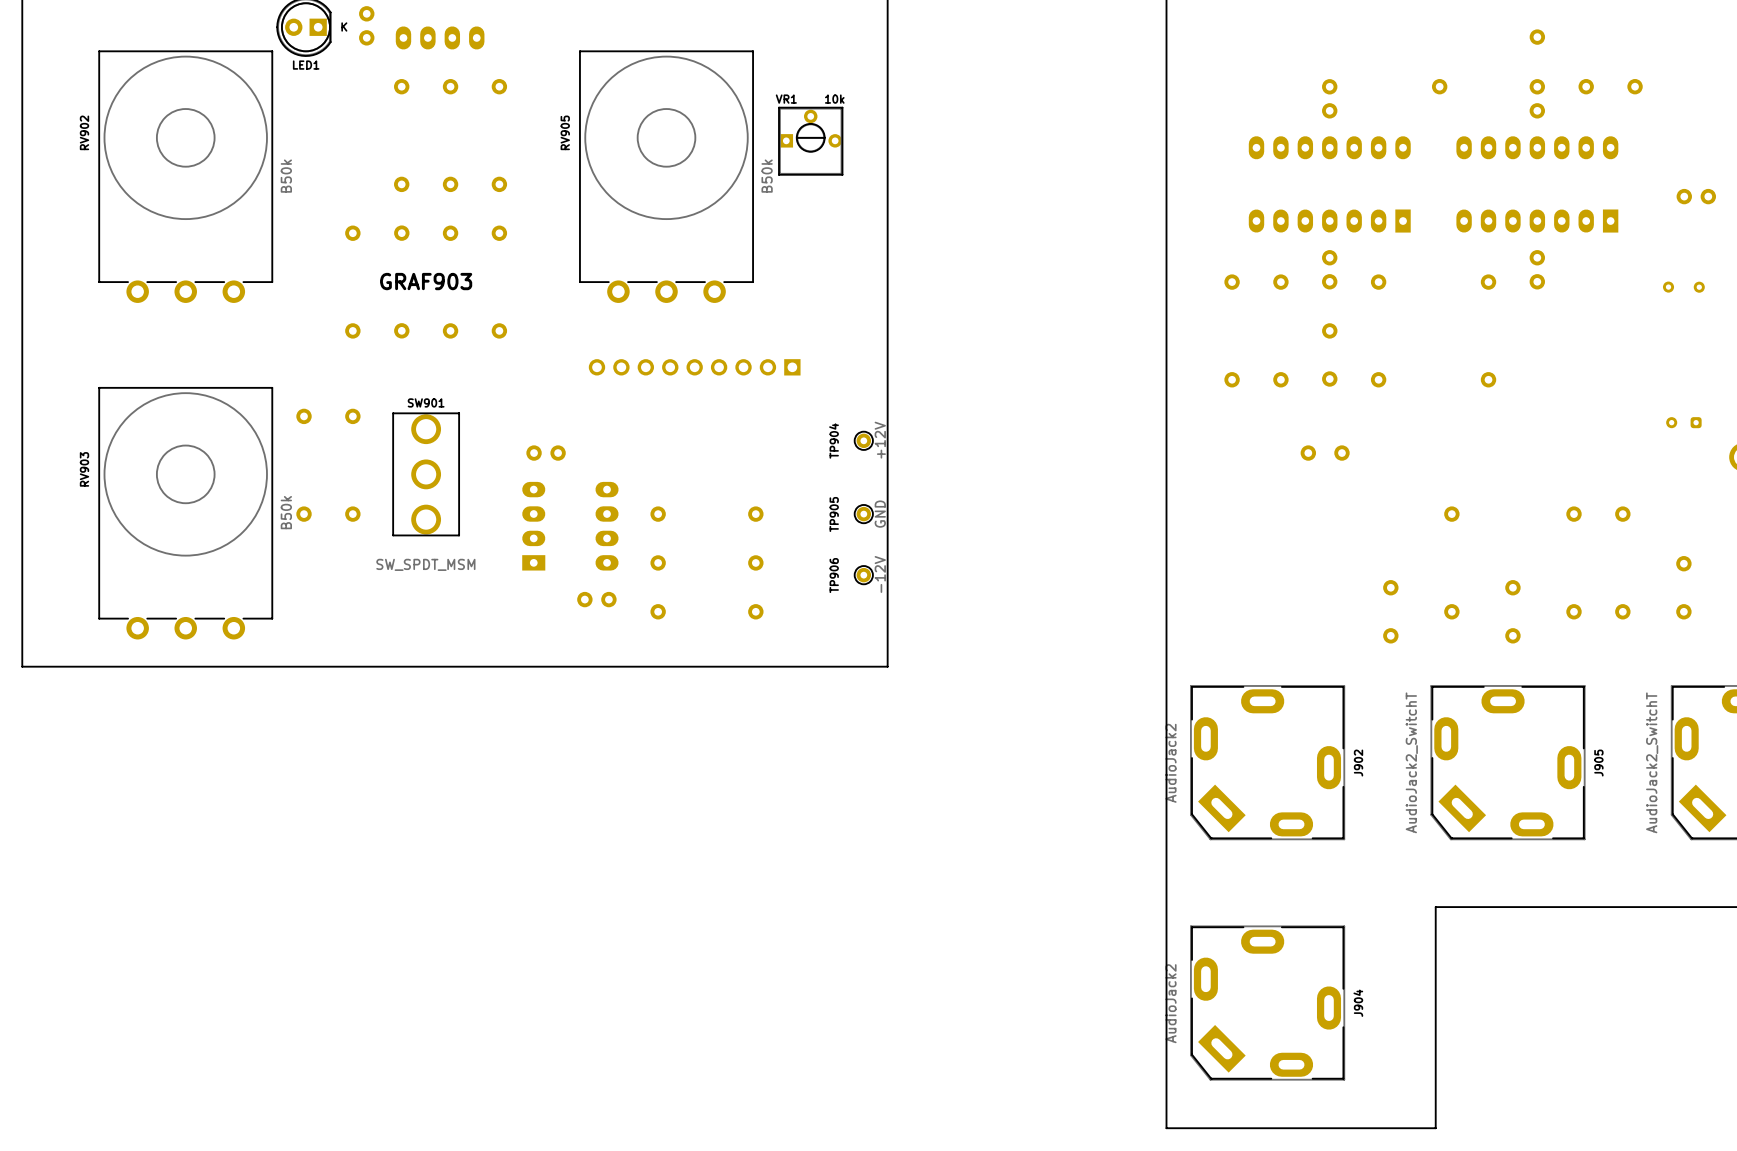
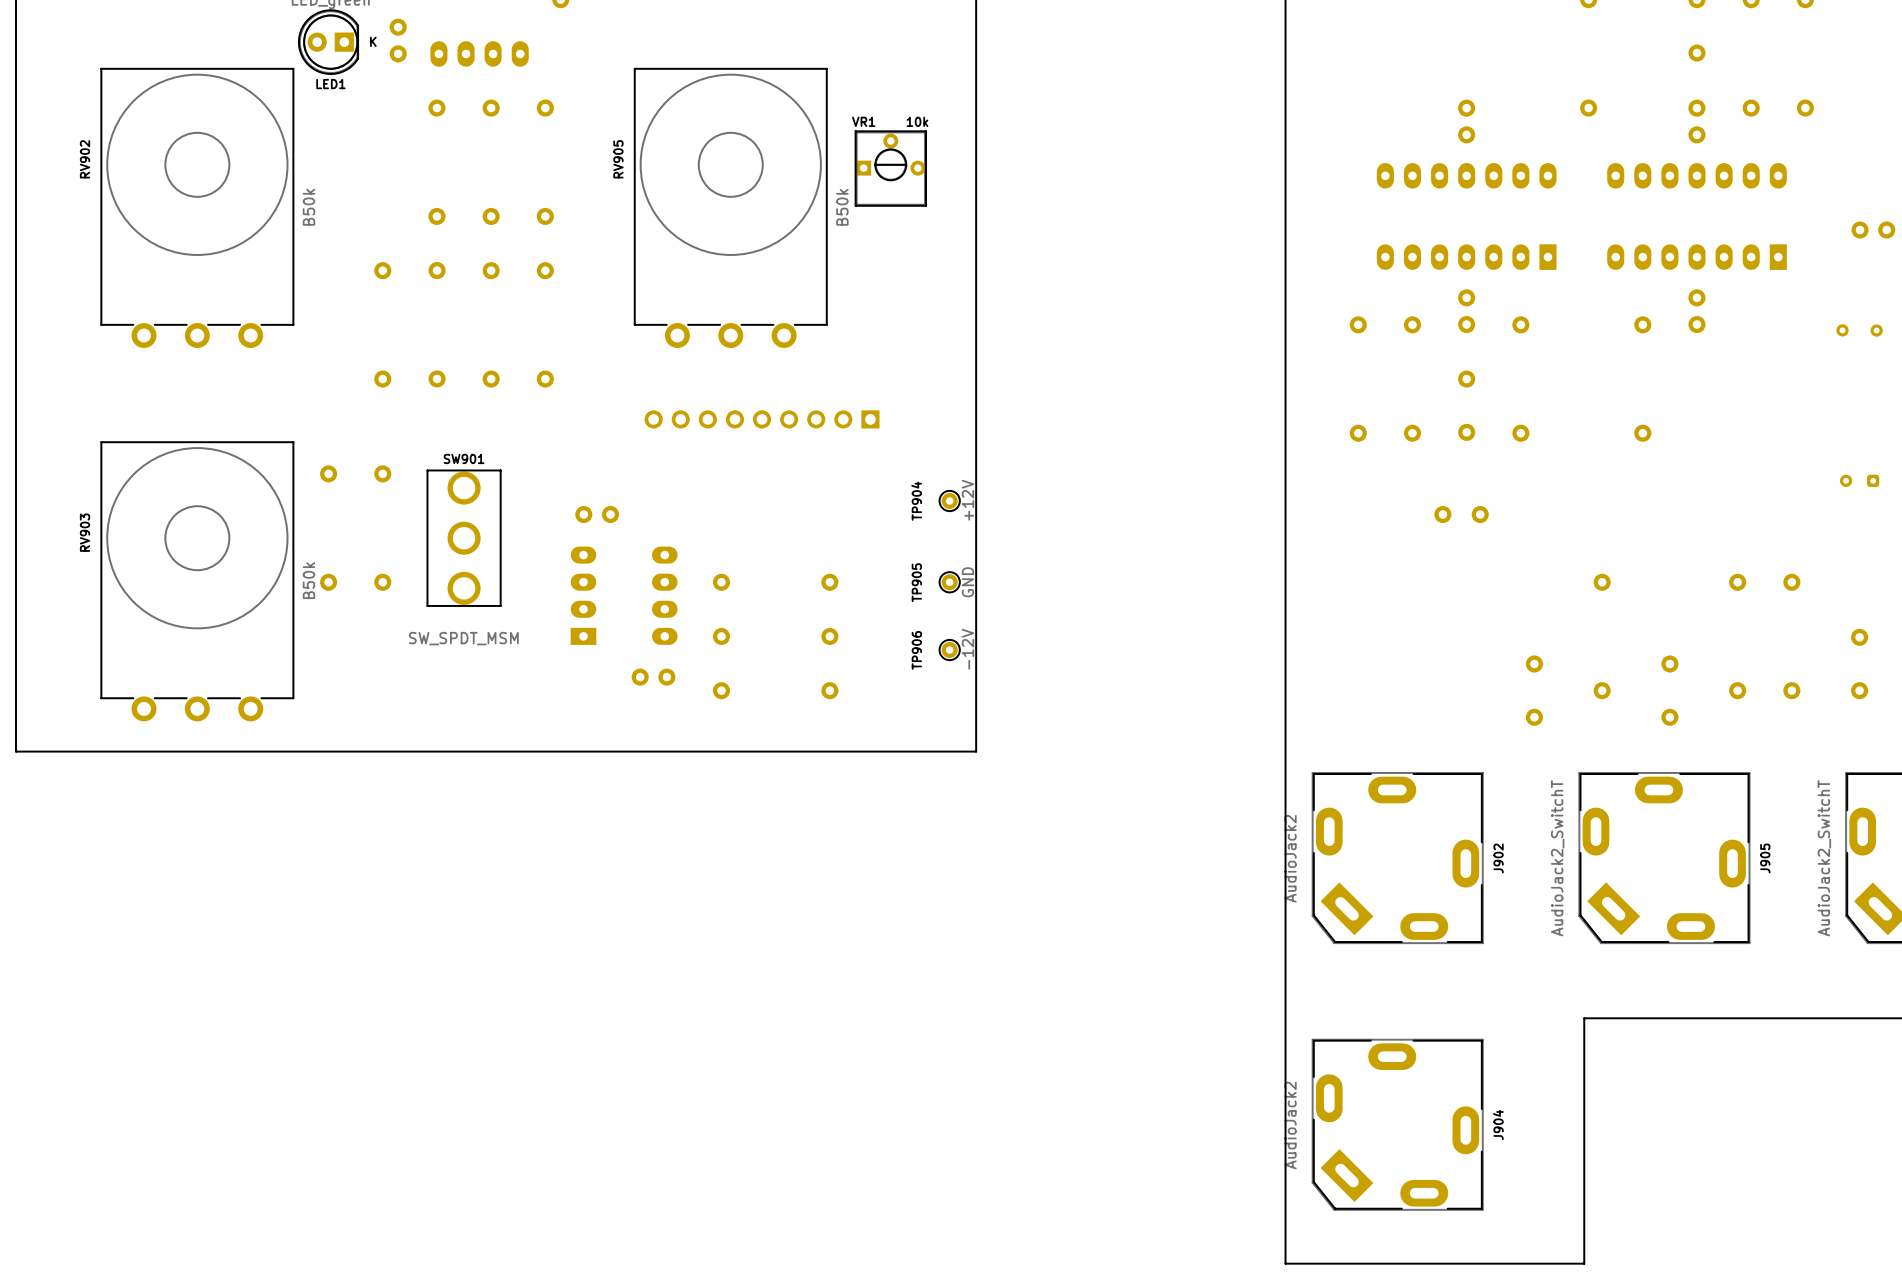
GRAF903: (426, 281) -> none

